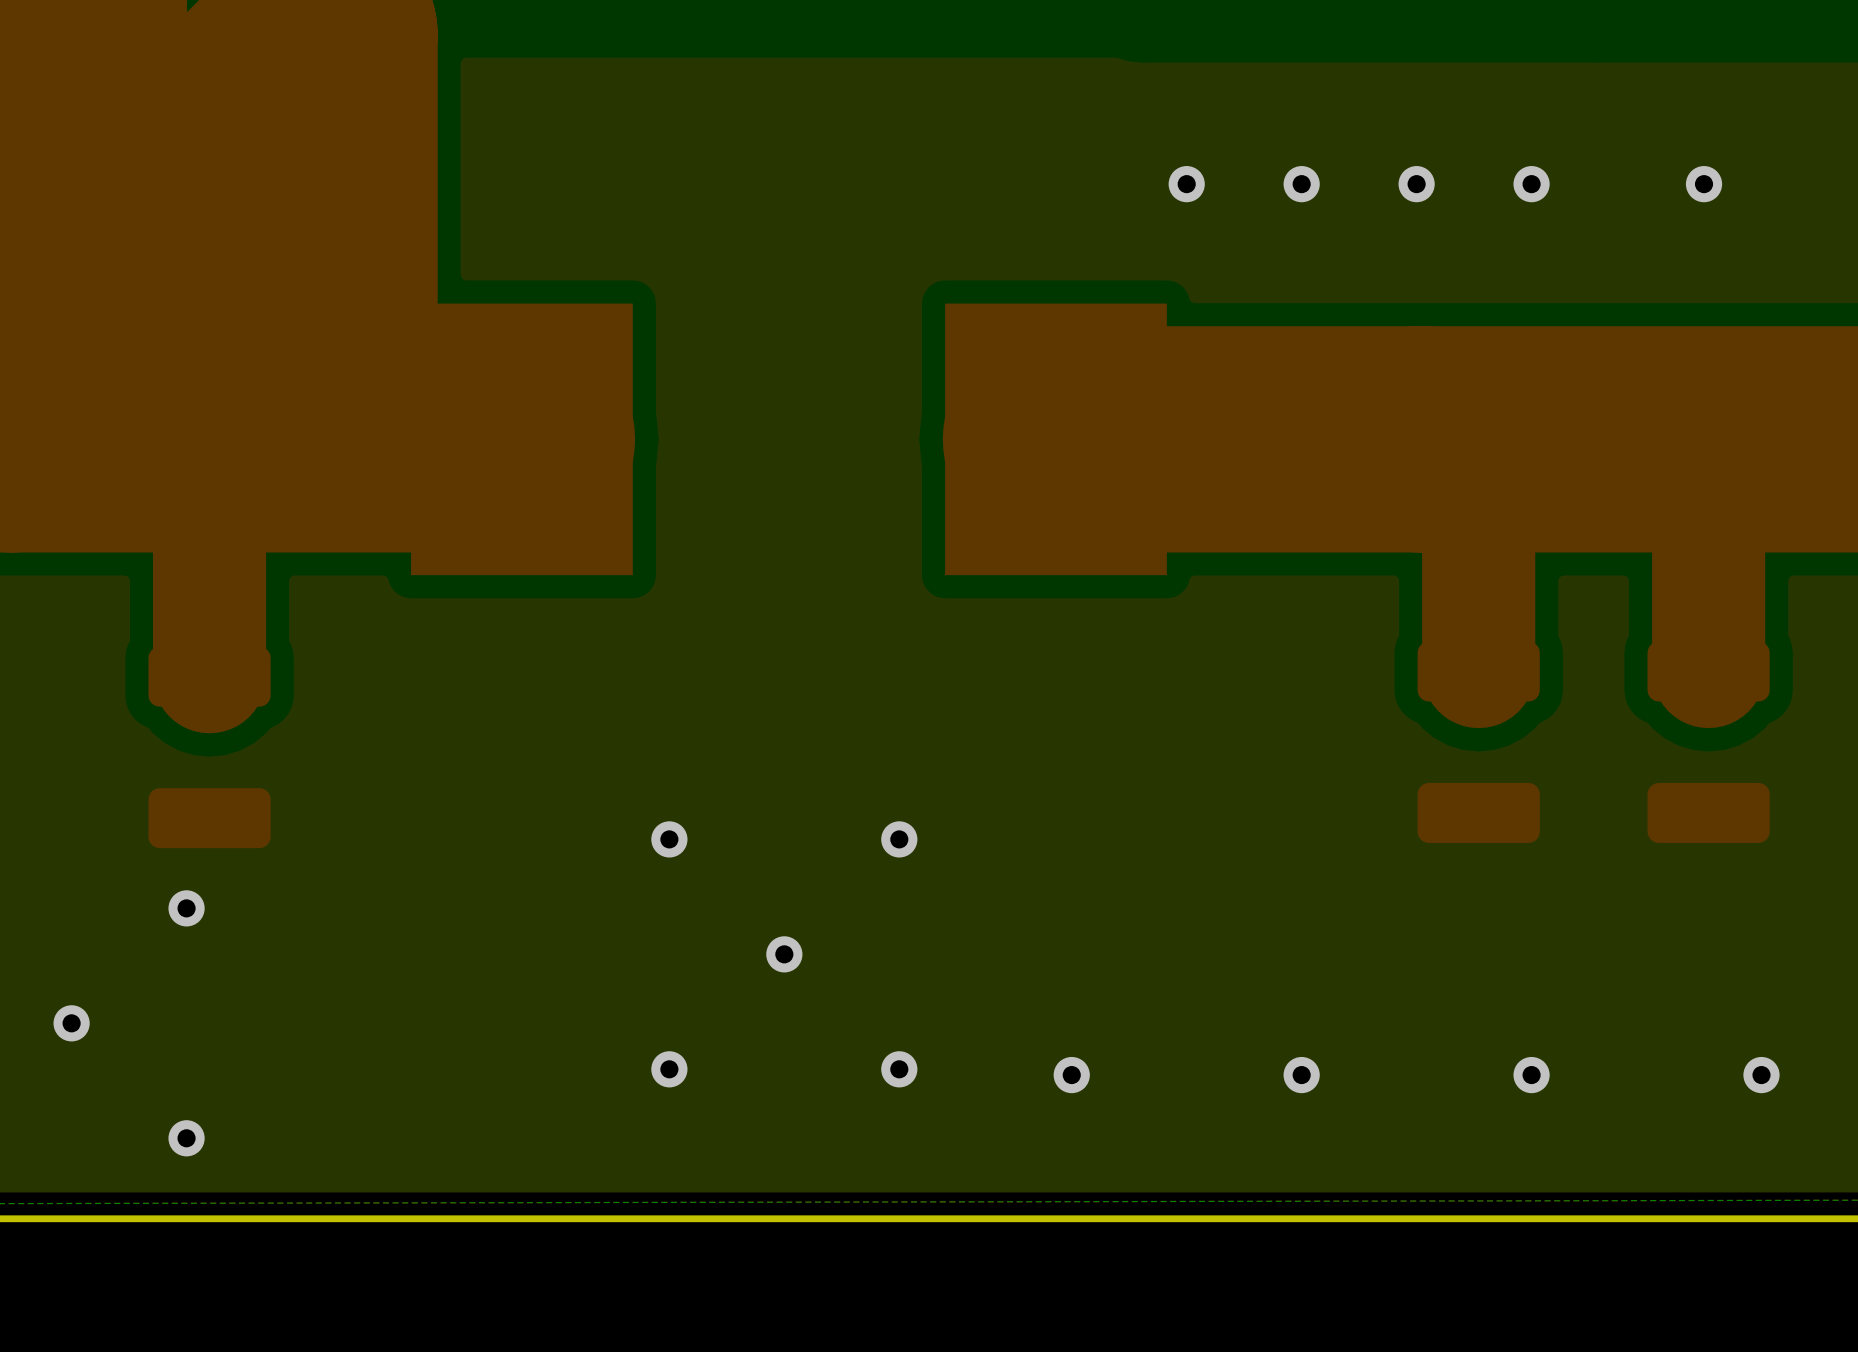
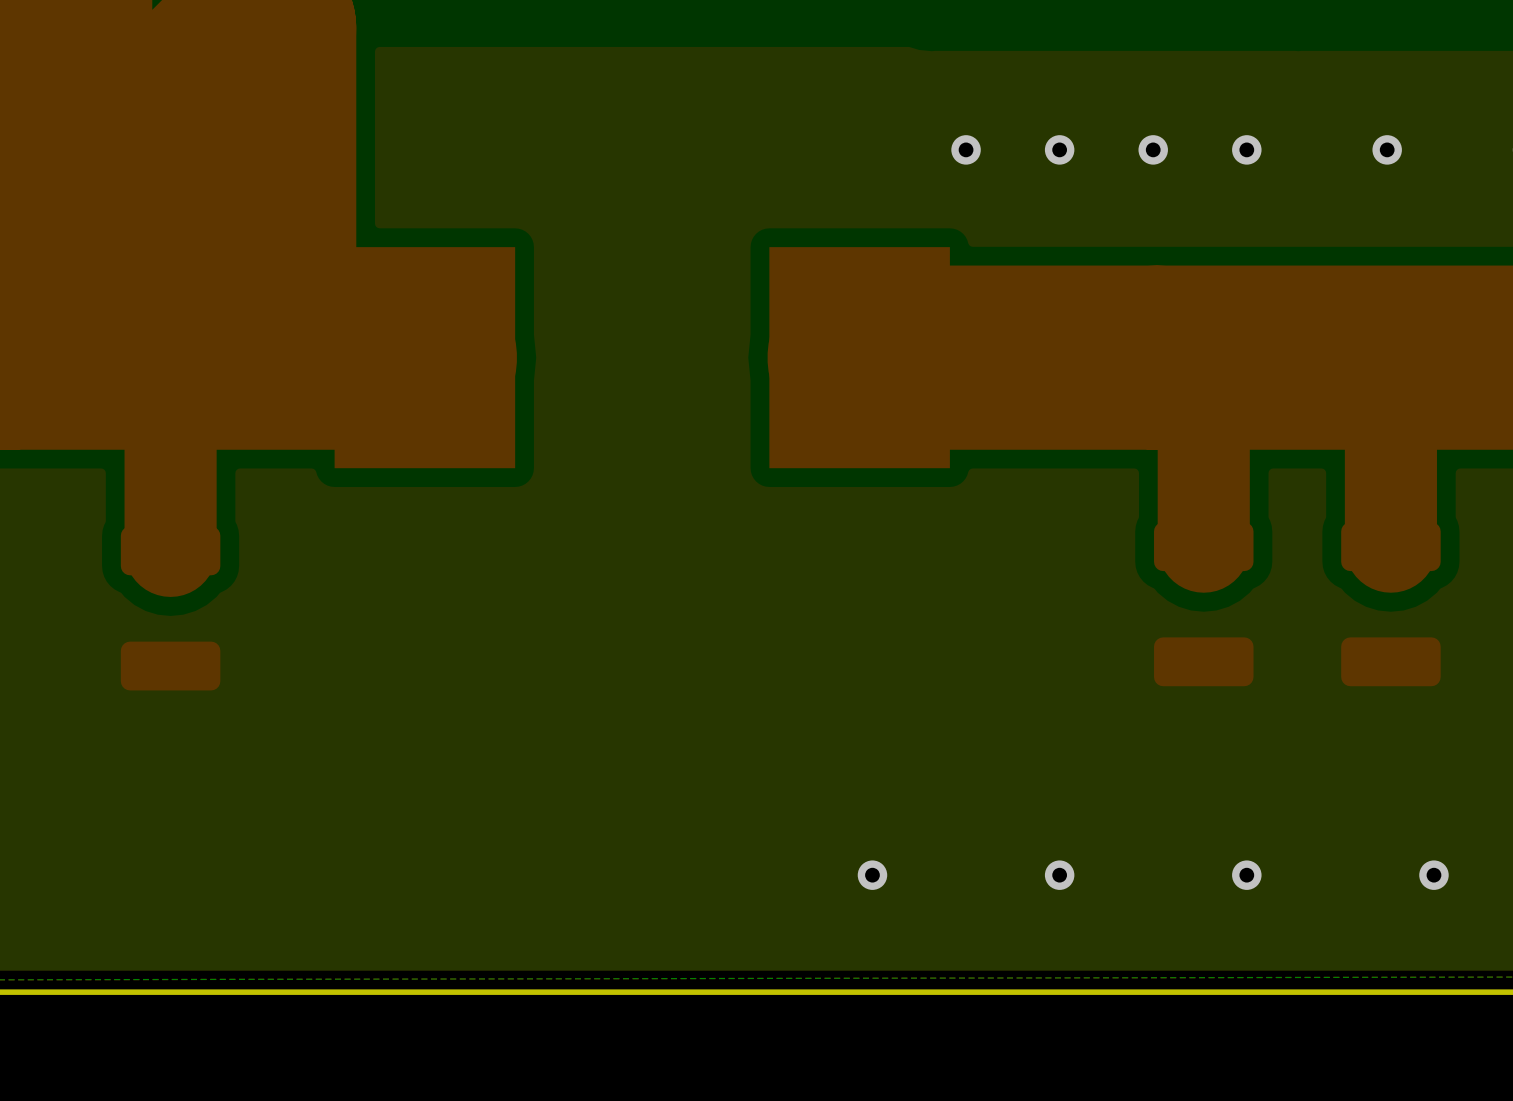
via: (669, 839) -> none
via: (899, 839) -> none
via: (186, 908) -> none
via: (784, 954) -> none
via: (71, 1023) -> none
via: (669, 1069) -> none
via: (899, 1069) -> none
via: (186, 1138) -> none

